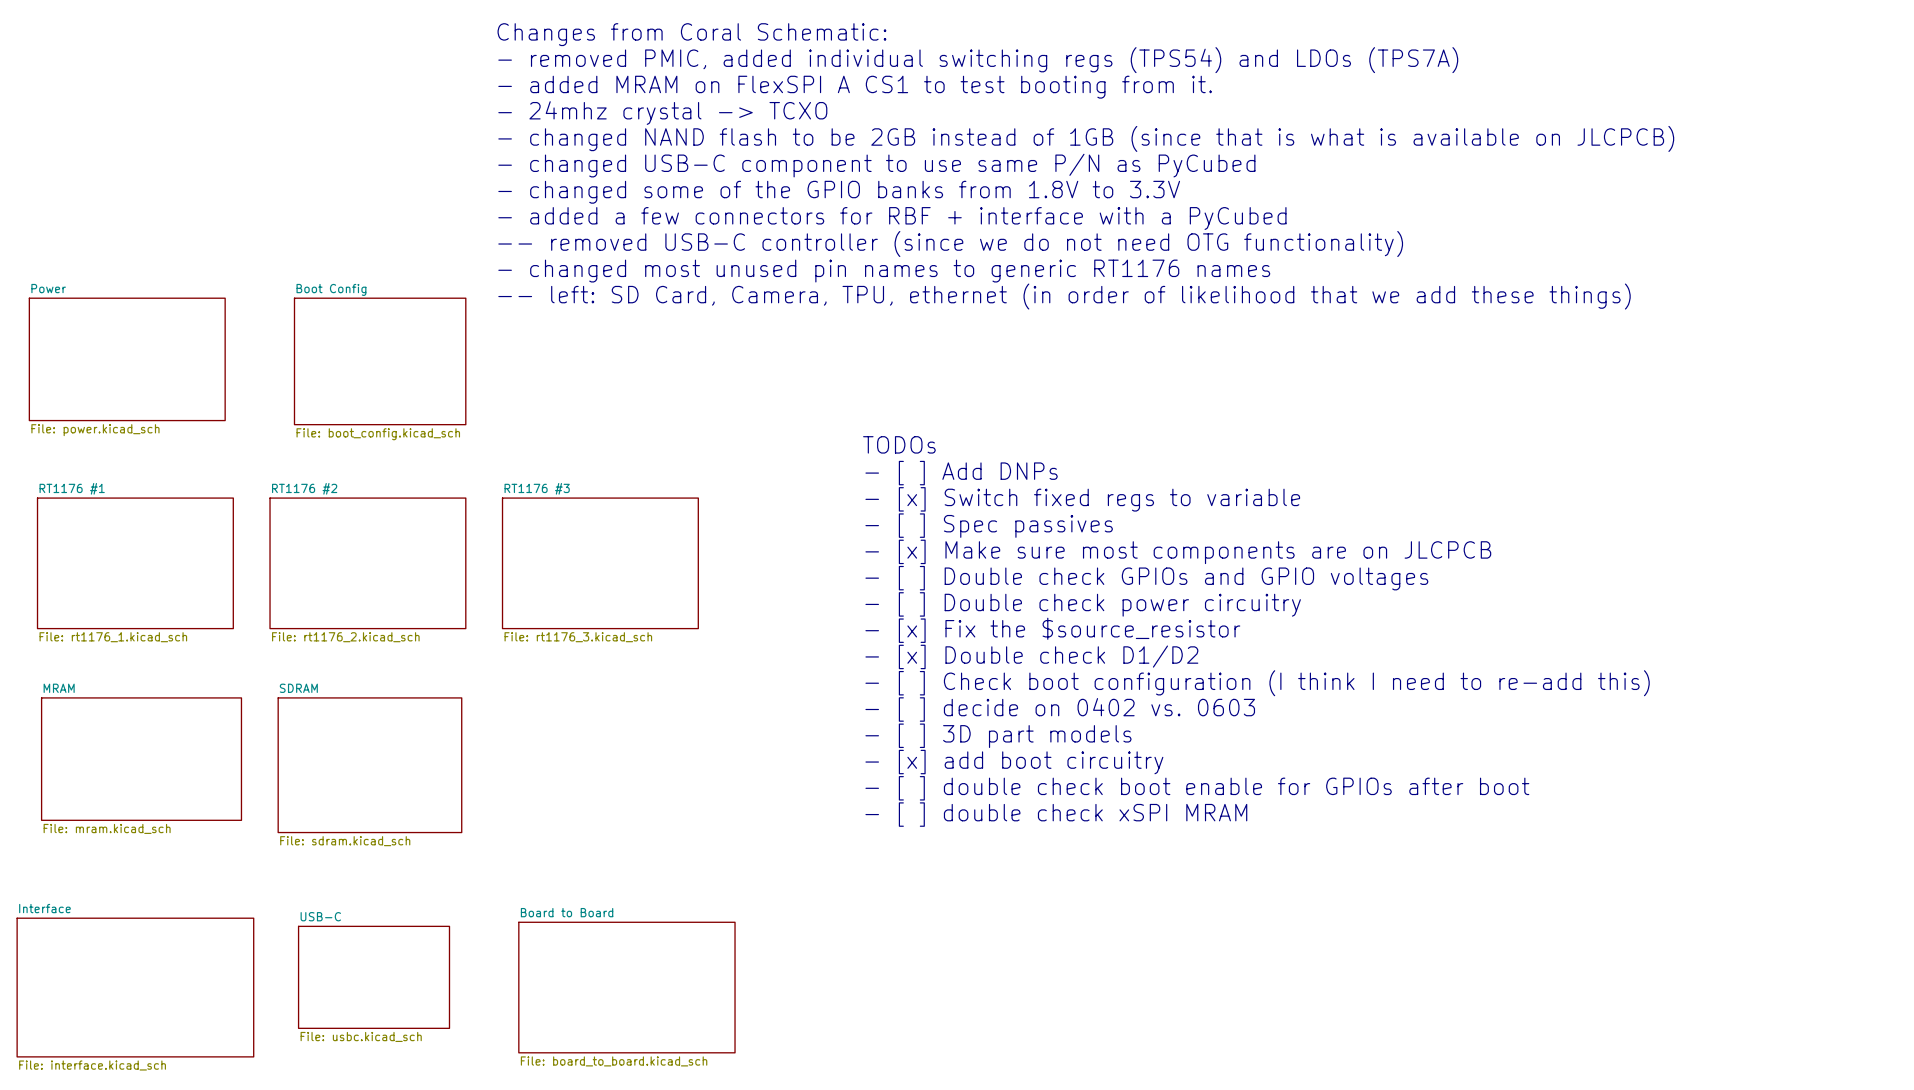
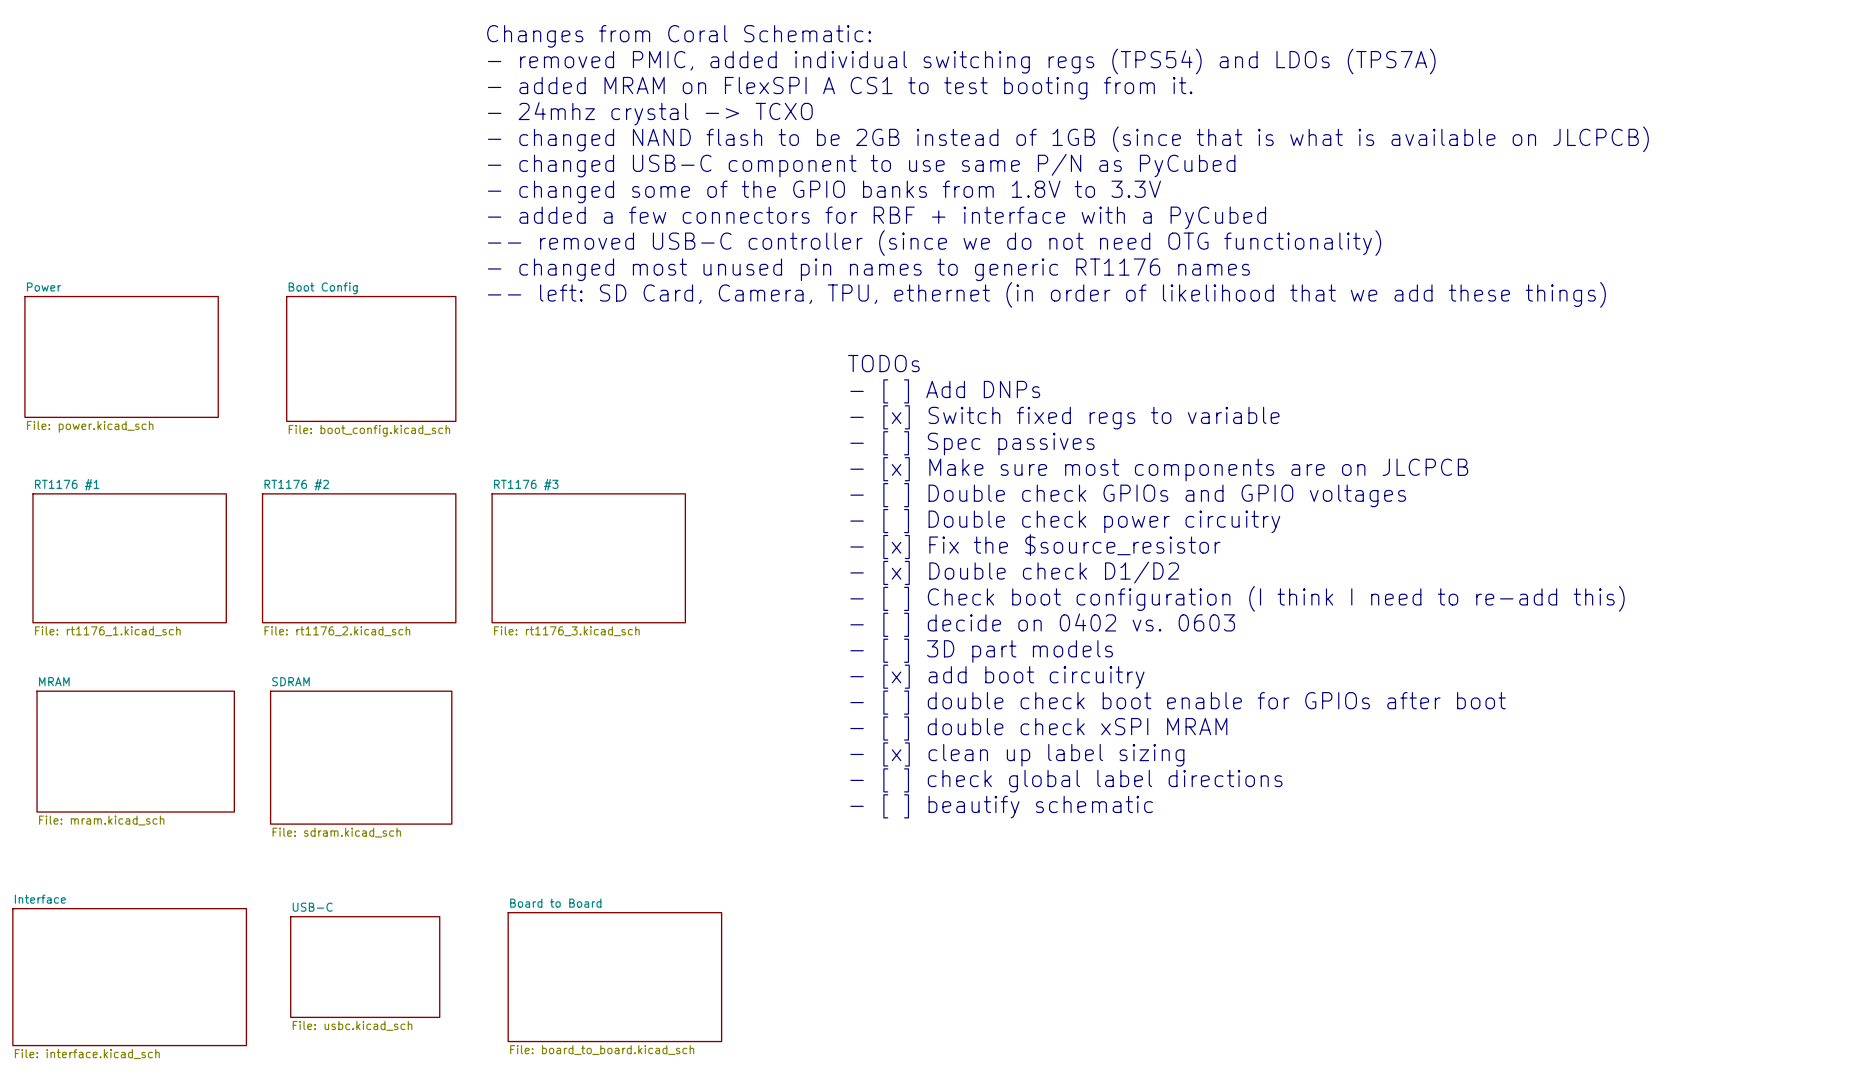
text: none -> TODOs (883, 363)
text: none -> - [ ] Add DNPs (945, 391)
text: none -> - [x] Switch fixed regs to variable (1064, 417)
text: TODOs (899, 444) -> - [ ] Spec passives (972, 443)
text: - [ ] Add DNPs (961, 473) -> - [x] Make sure most components are on JLCPCB (1159, 469)
text: - [x] Switch fixed regs to variable (1082, 499) -> - [ ] Double check GPIOs and GPIO voltages (1128, 495)
text: - [ ] Spec passives (989, 525) -> - [ ] Double check power circuitry (1065, 521)
text: - [x] Make sure most components are on JLCPCB (1178, 551) -> - [x] Fix the $source_resistor (1035, 546)
text: - [ ] Double check GPIOs and GPIO voltages (1146, 578) -> - [x] Double check D1/D2 (1014, 572)
text: - [ ] Double check power circuitry (1083, 604) -> - [ ] Check boot configuration (I think I need to re-add this) (1237, 598)
text: - [x] Fix the $source_resistor (1052, 630) -> - [ ] decide on 0402 vs. 0603 (1042, 624)
text: - [x] Double check D1/D2 (1031, 656) -> - [ ] 3D part models (981, 650)
text: - [ ] Check boot configuration (I think I need to re-add this) (1257, 683) -> - [x] add boot circuitry (997, 676)
text: - [ ] decide on 0402 vs. 0603 (1060, 709) -> - [ ] double check boot enable for GPIOs after boot (1178, 702)
text: - [ ] 3D part models (998, 735) -> - [ ] double check xSPI MRAM (1038, 728)
text: - [x] add boot circuitry (1014, 762) -> - [x] clean up label sizing (1017, 754)
text: - [ ] double check boot enable for GPIOs after boot (1197, 788) -> - [ ] check global label directions (1066, 780)
text: - [ ] double check xSPI MRAM (1056, 814) -> - [ ] beautify schematic (1001, 806)

